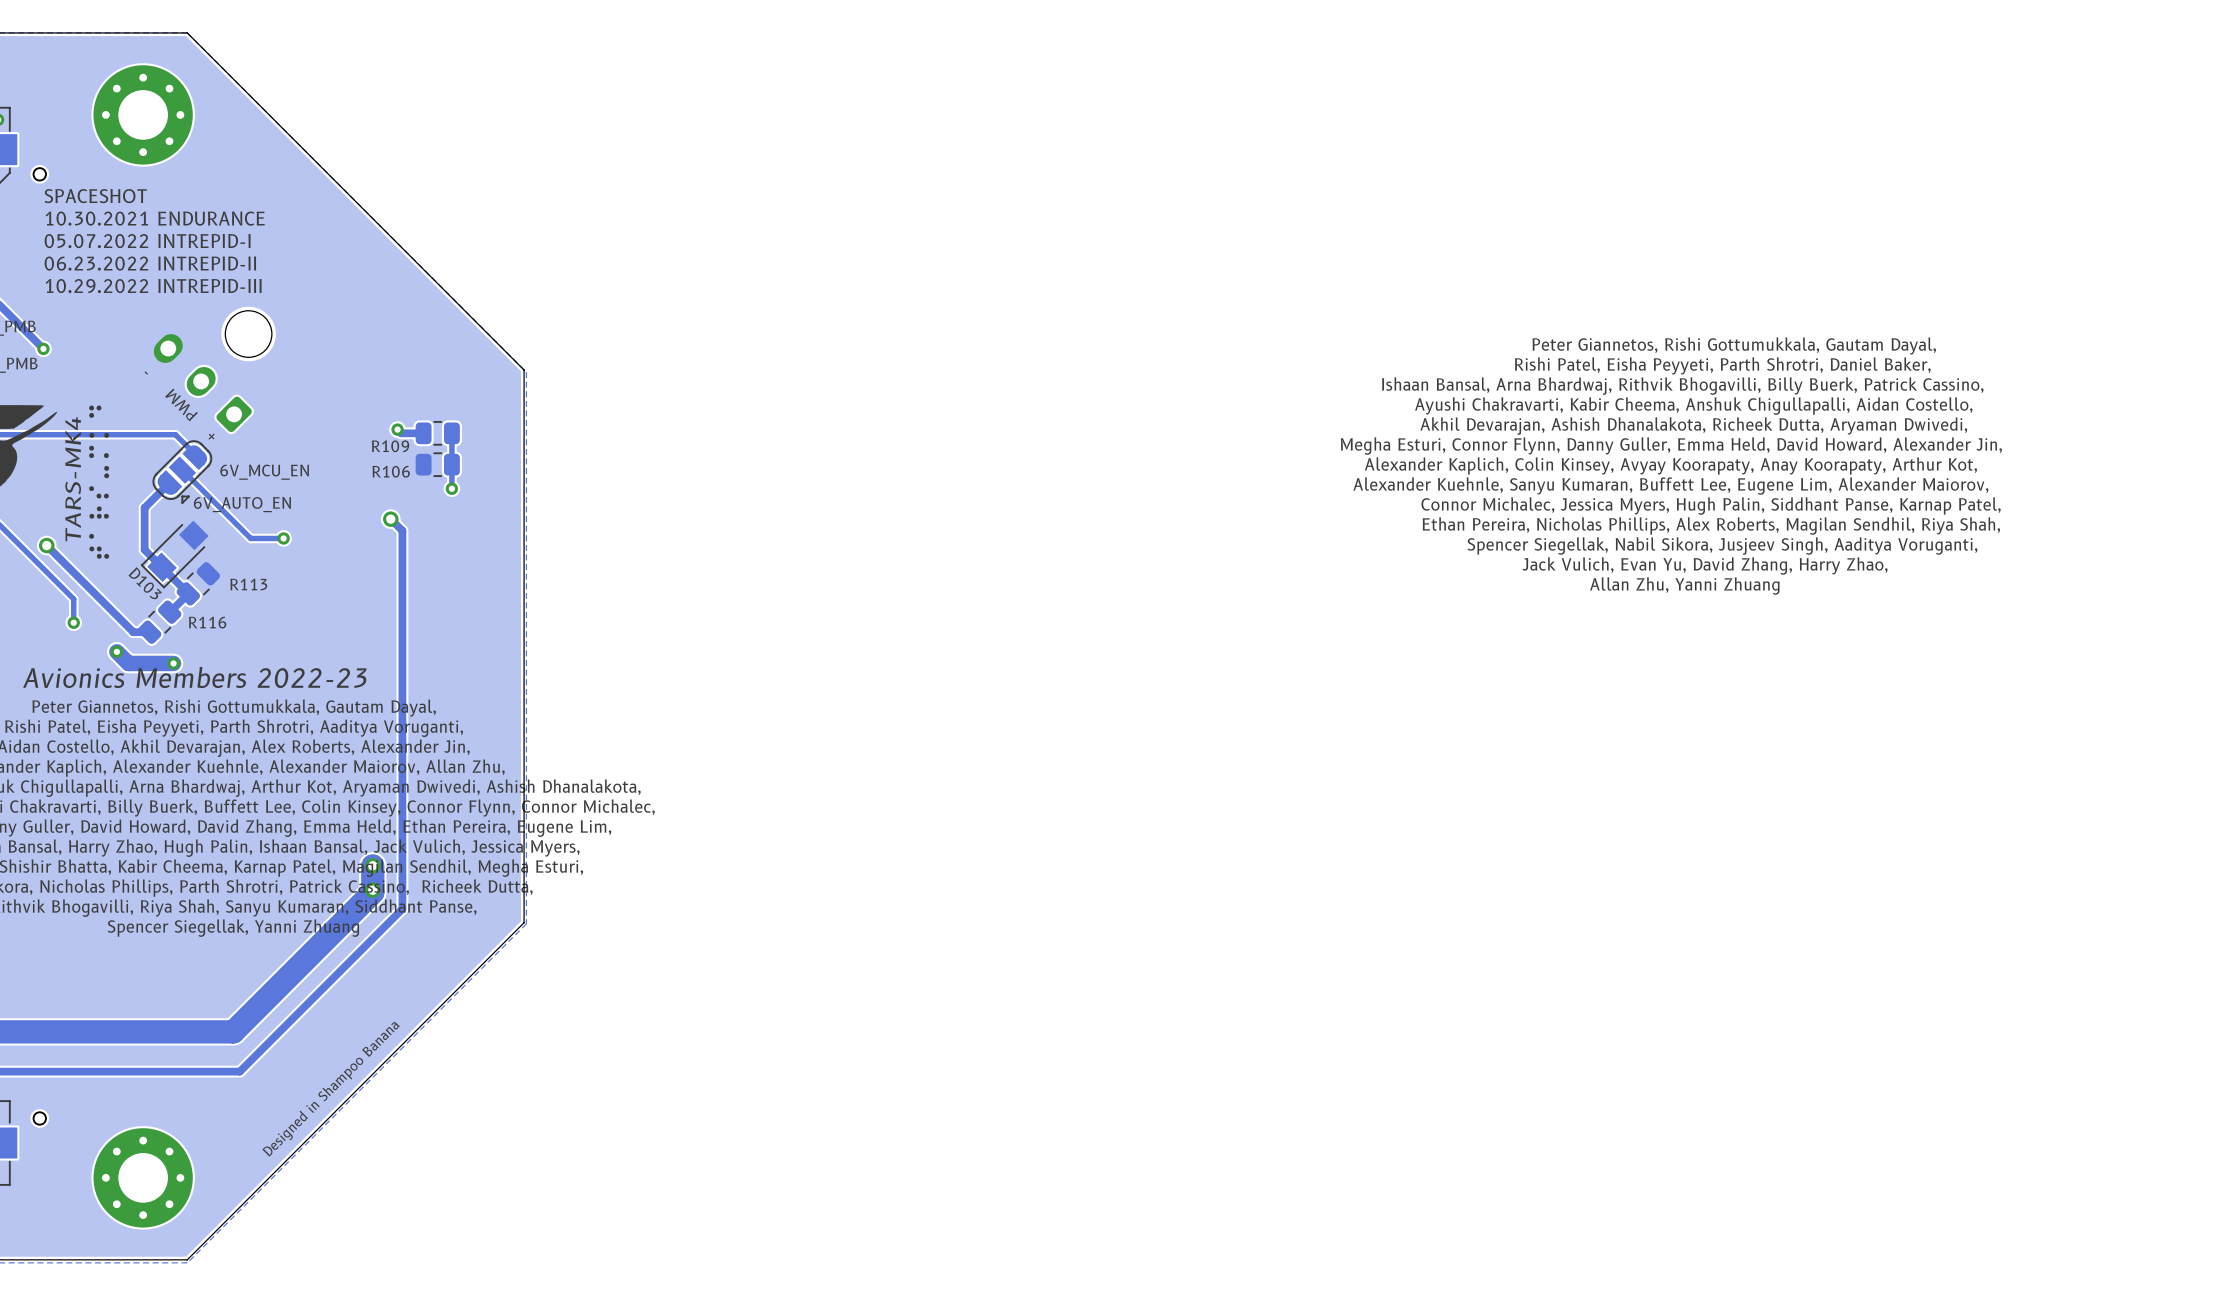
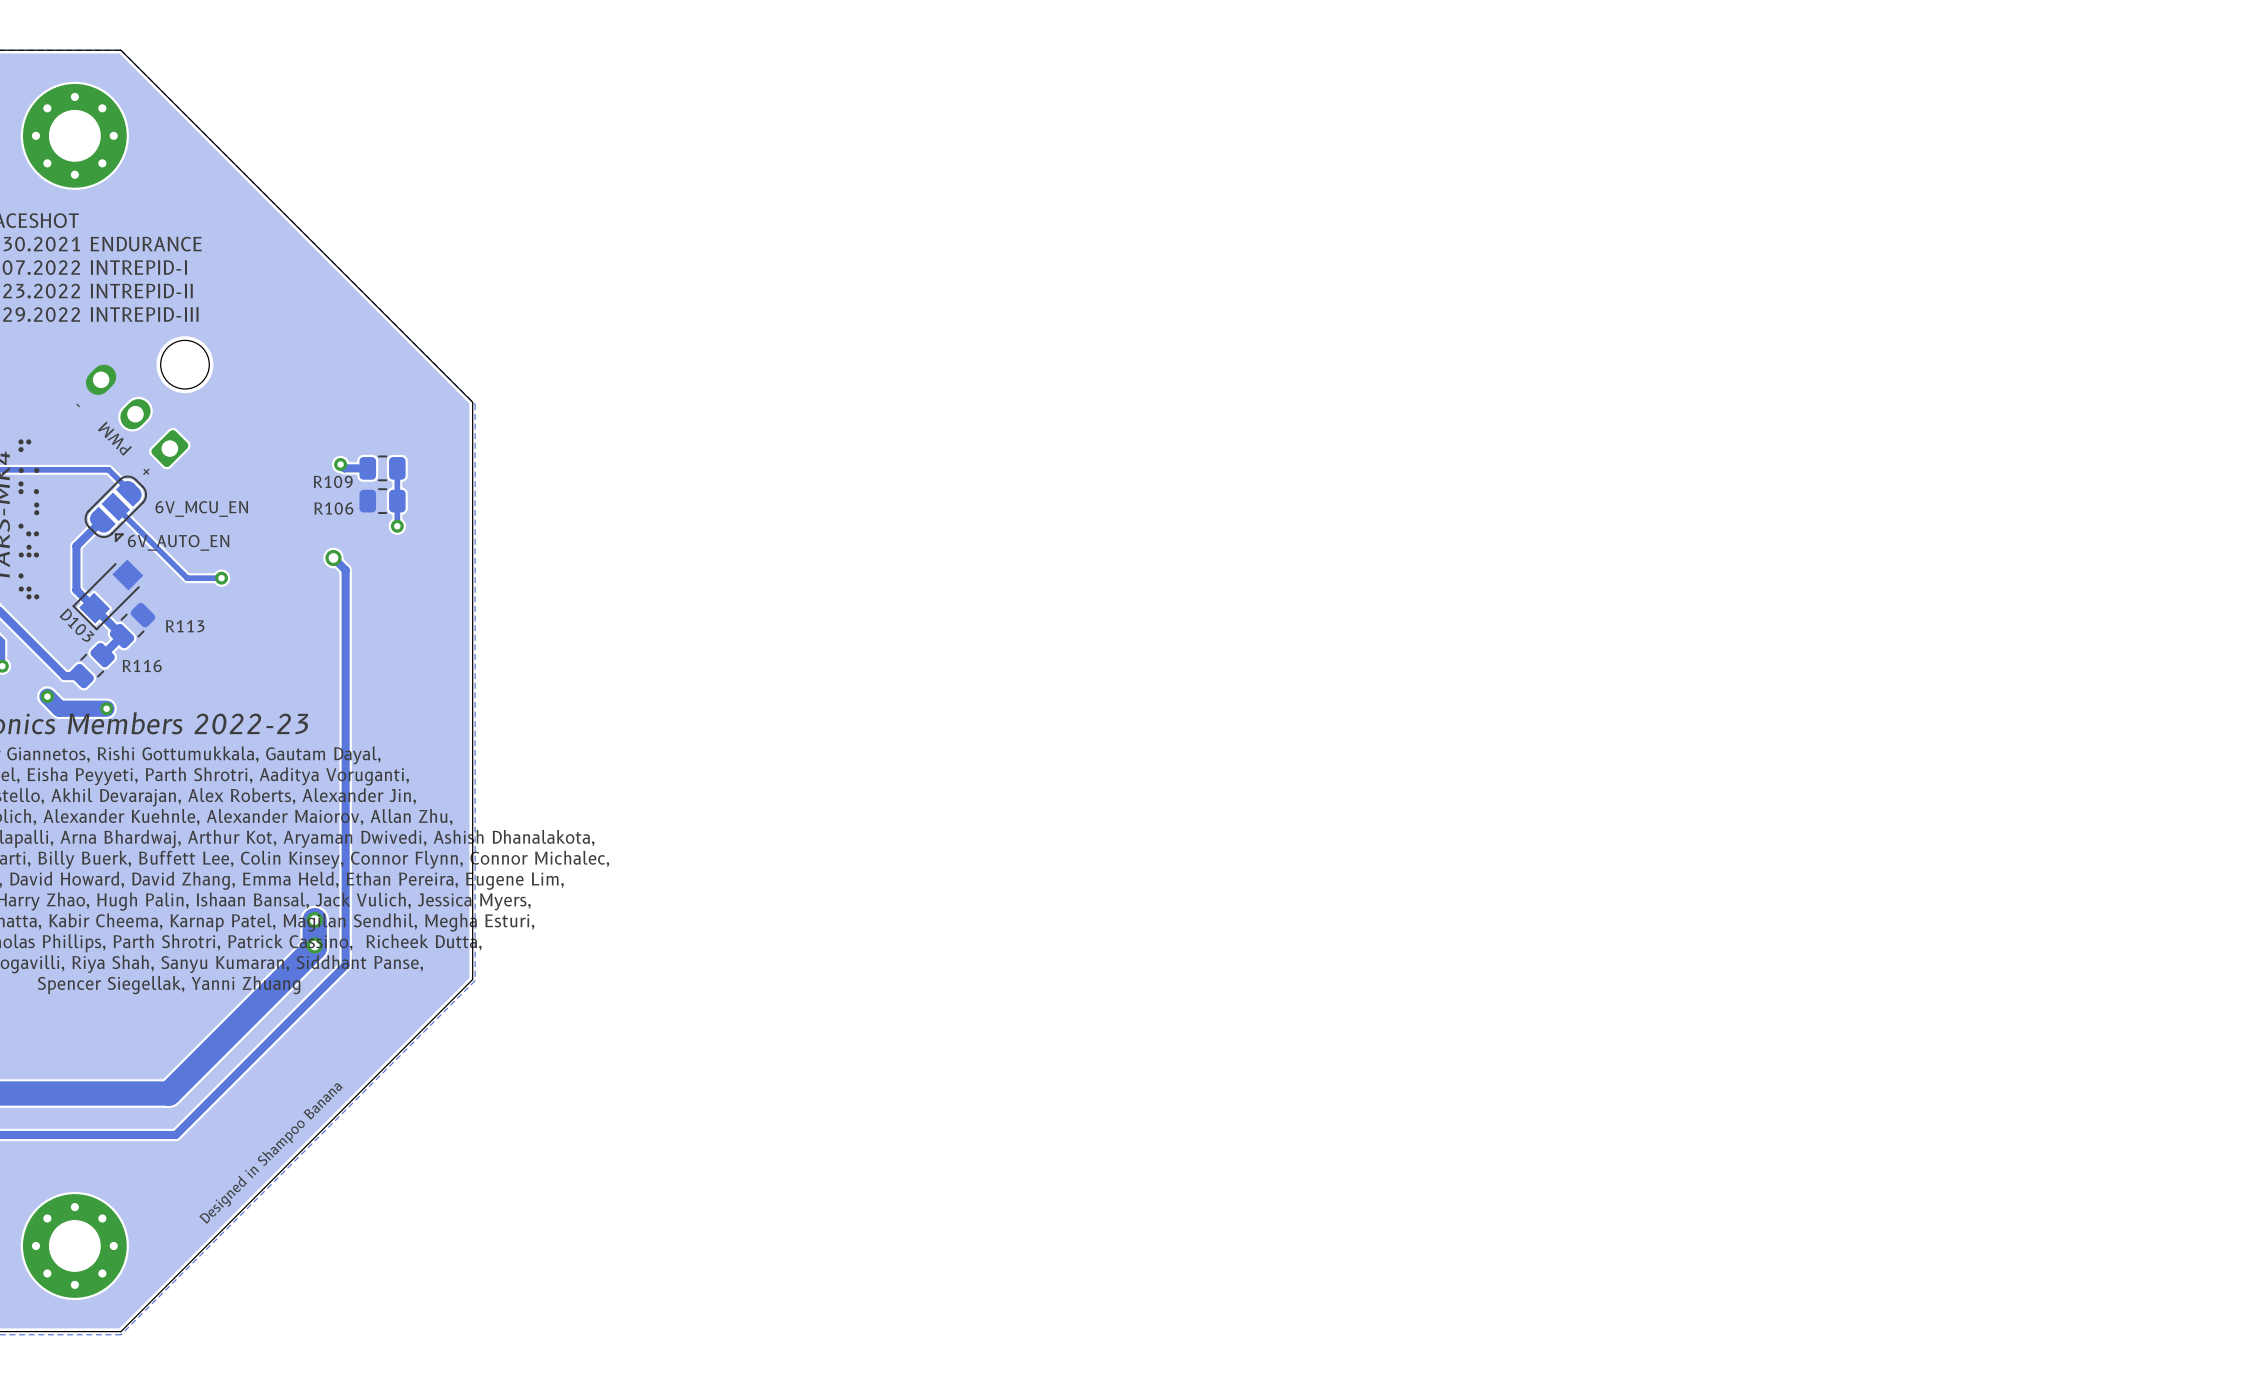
text: Peter Giannetos, Rishi Gottumukkala, Gautam Dayal, (1734, 345) -> none
text: Rishi Patel, Eisha Peyyeti, Parth Shrotri, Daniel Baker, (1722, 365) -> none
text: Ishaan Bansal, Arna Bhardwaj, Rithvik Bhogavilli, Billy Buerk, Patrick Cassino, (1682, 386) -> none
text: Ayushi Chakravarti, Kabir Cheema, Anshuk Chigullapalli, Aidan Costello, (1693, 406) -> none
text: Akhil Devarajan, Ashish Dhanalakota, Richeek Dutta, Aryaman Dwivedi, (1693, 426) -> none
text: Megha Esturi, Connor Flynn, Danny Guller, Emma Held, David Howard, Alexander Jin, (1671, 446) -> none
text: Alexander Kaplich, Colin Kinsey, Avyay Koorapaty, Anay Koorapaty, Arthur Kot, (1670, 466) -> none
text: Alexander Kuehnle, Sanyu Kumaran, Buffett Lee, Eugene Lim, Alexander Maiorov, (1670, 486) -> none
text: Connor Michalec, Jessica Myers, Hugh Palin, Siddhant Panse, Karnap Patel, (1711, 506) -> none
text: Ethan Pereira, Nicholas Phillips, Alex Roberts, Magilan Sendhil, Riya Shah, (1711, 526) -> none
text: Spencer Siegellak, Nabil Sikora, Jusjeev Singh, Aaditya Voruganti, (1722, 546) -> none
text: Jack Vulich, Evan Yu, David Zhang, Harry Zhao, (1704, 566) -> none
text: Allan Zhu, Yanni Zhuang (1684, 586) -> none

